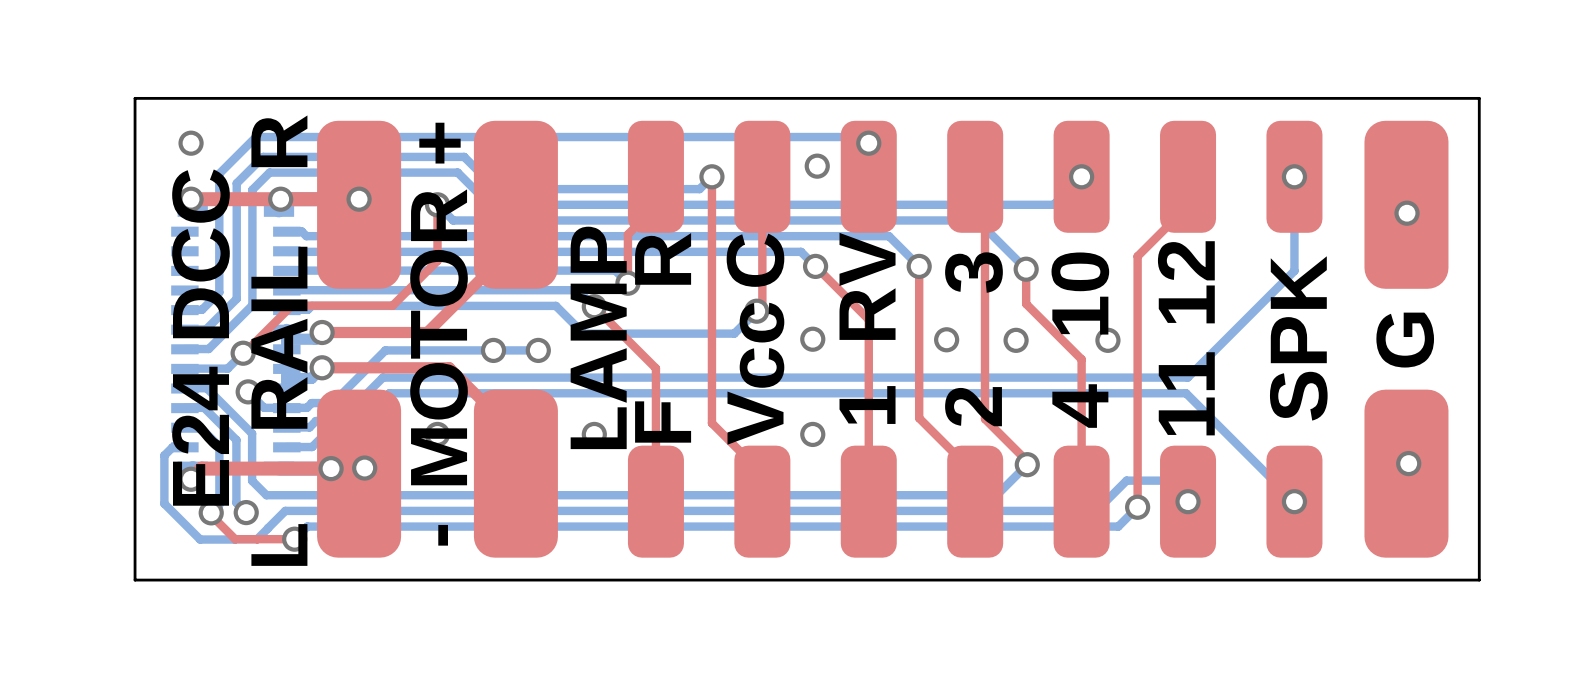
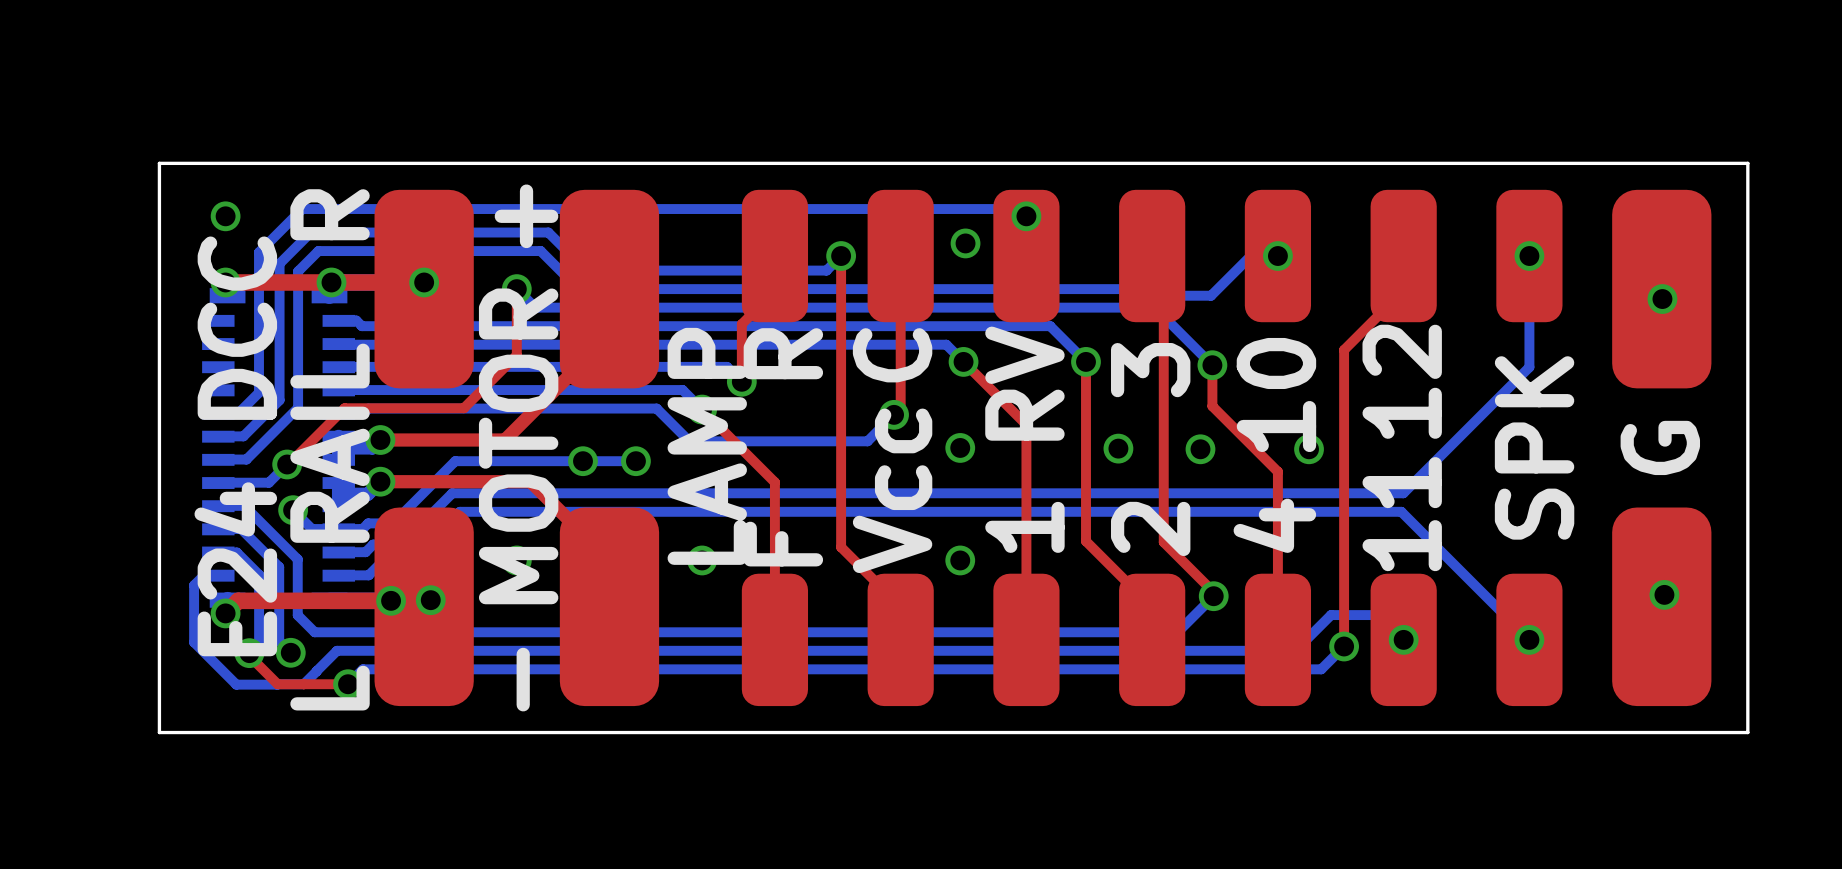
bottom track: (1081, 177) (1053, 204) (983, 204) -> (1277, 256) (1264, 242) (1211, 295) (1169, 295) (1162, 289)

